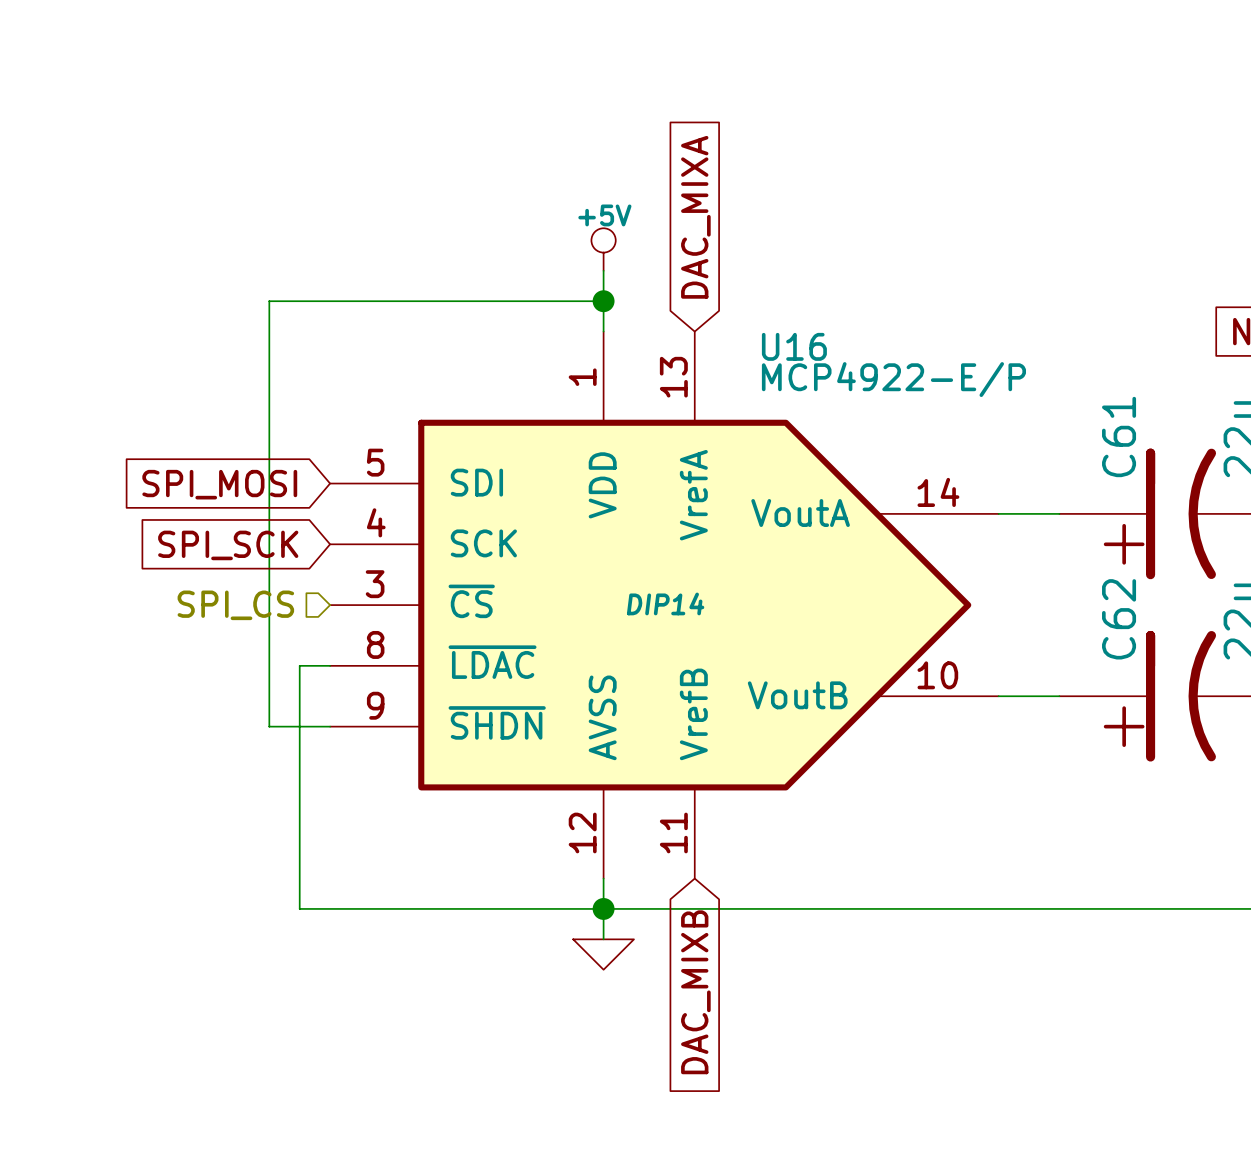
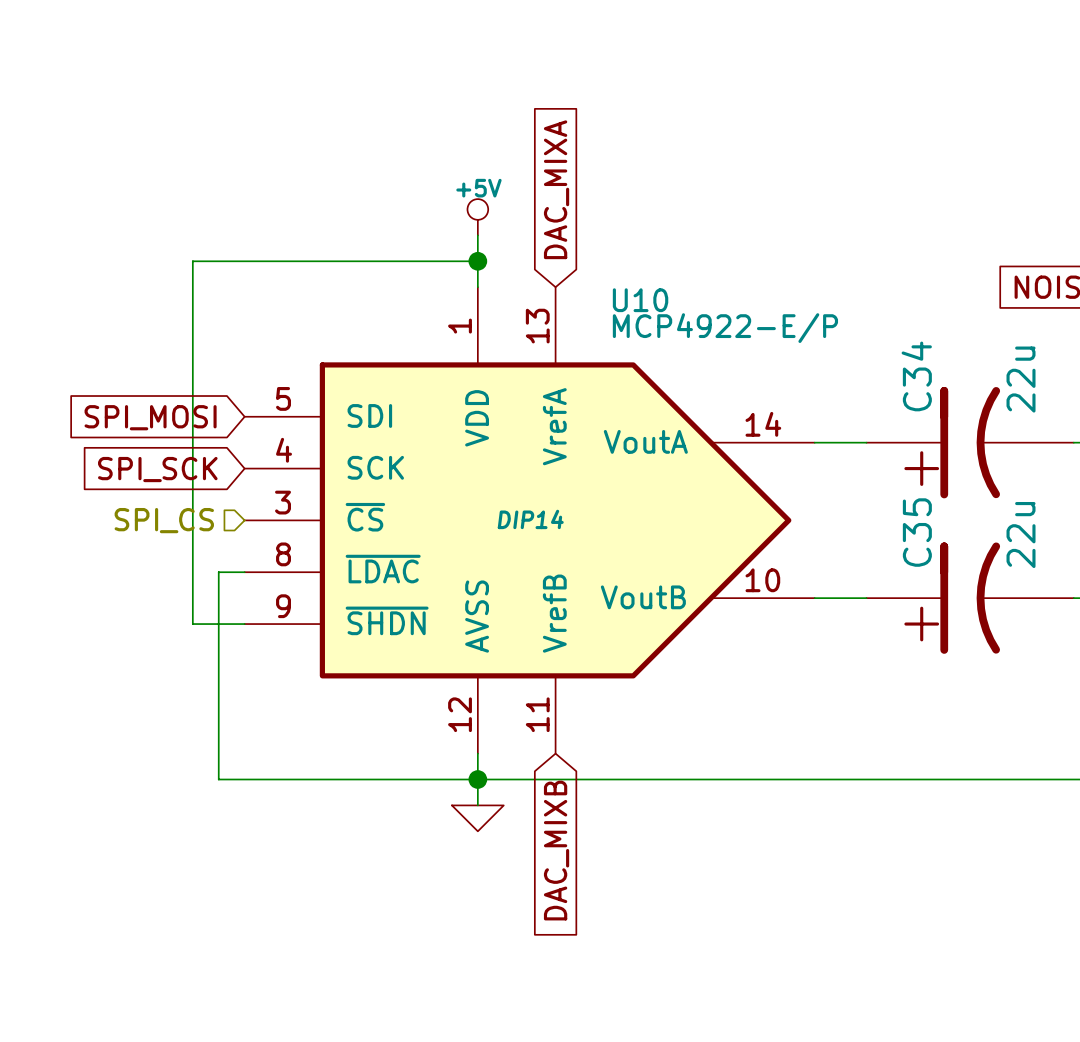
U16 name: U16 (794, 346) -> U10 (640, 300)
C61 name: C61 (1119, 437) -> C34 (916, 376)
C62 name: C62 (1119, 619) -> C35 (917, 532)

